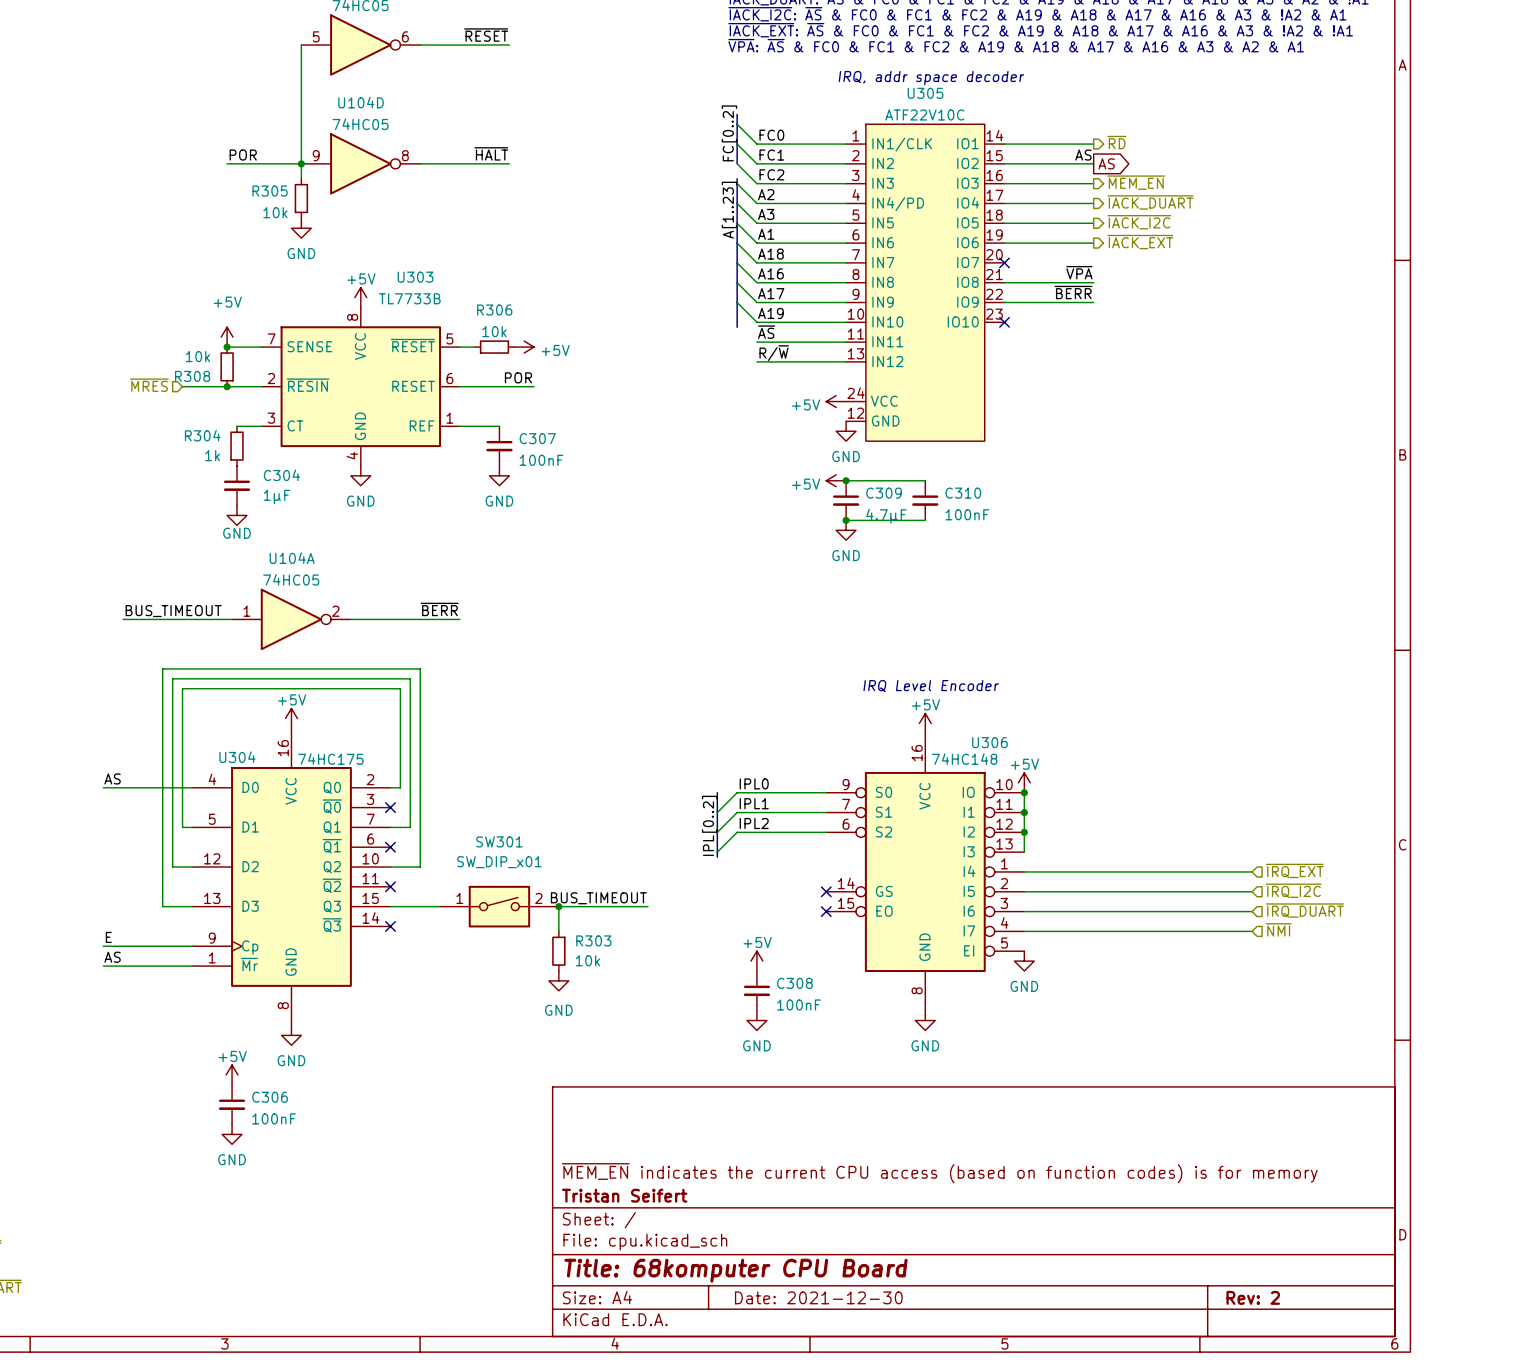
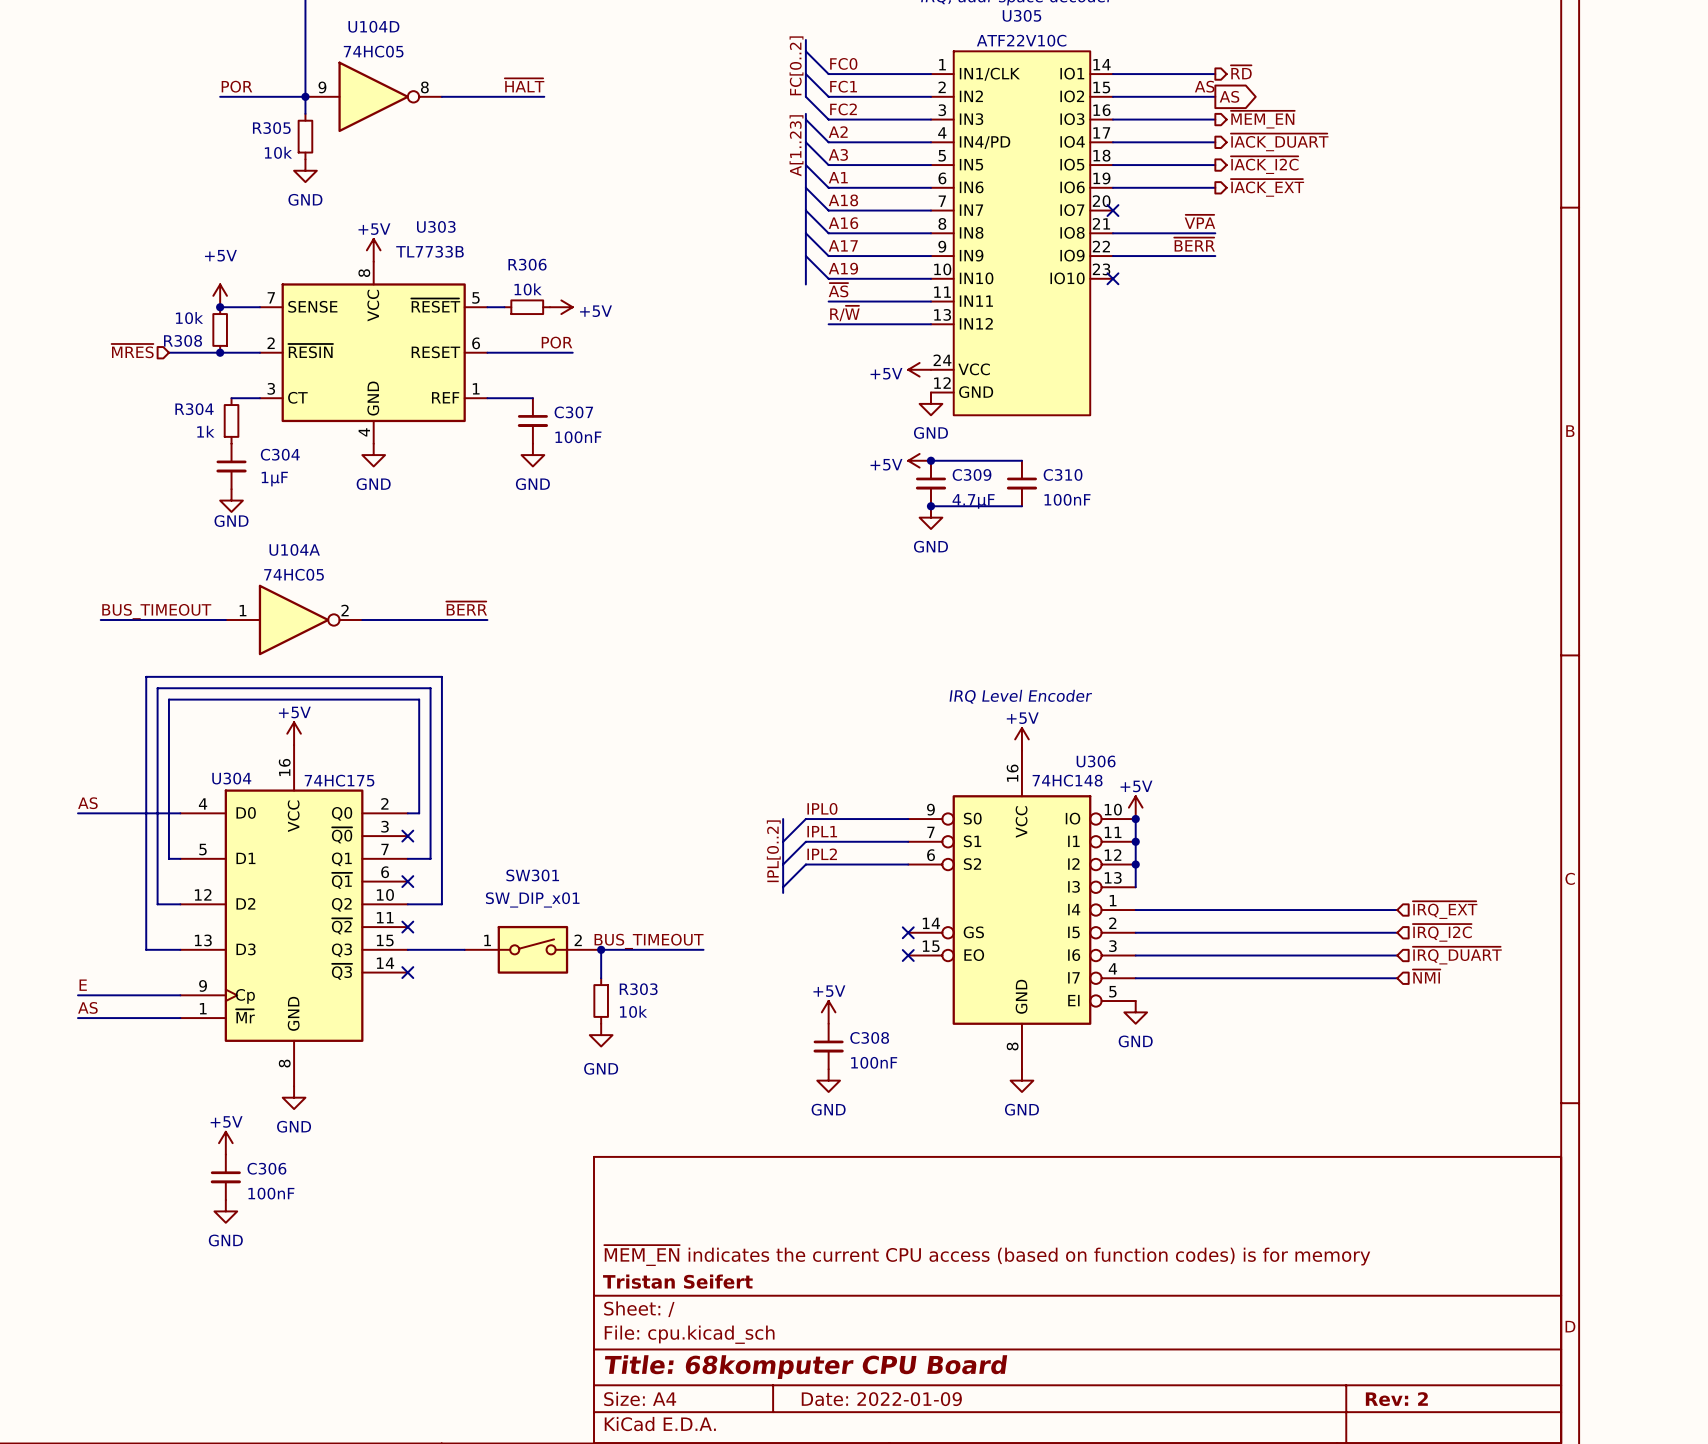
title block: Date: 2021-12-30 (818, 1297) -> Date: 2022-01-09 (881, 1399)

